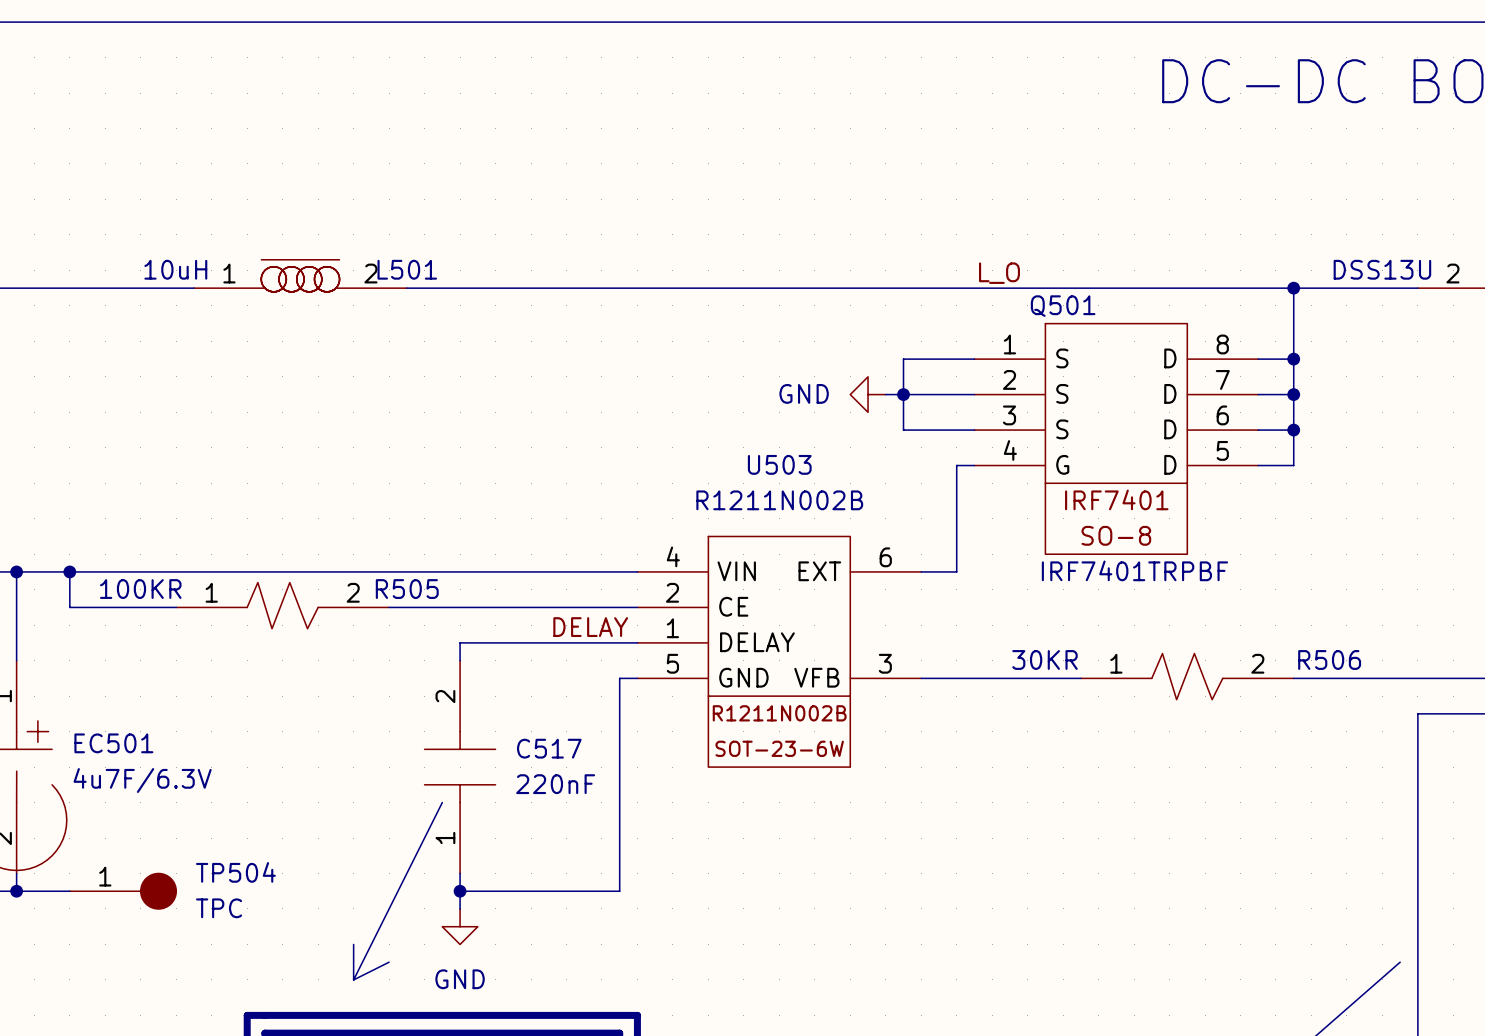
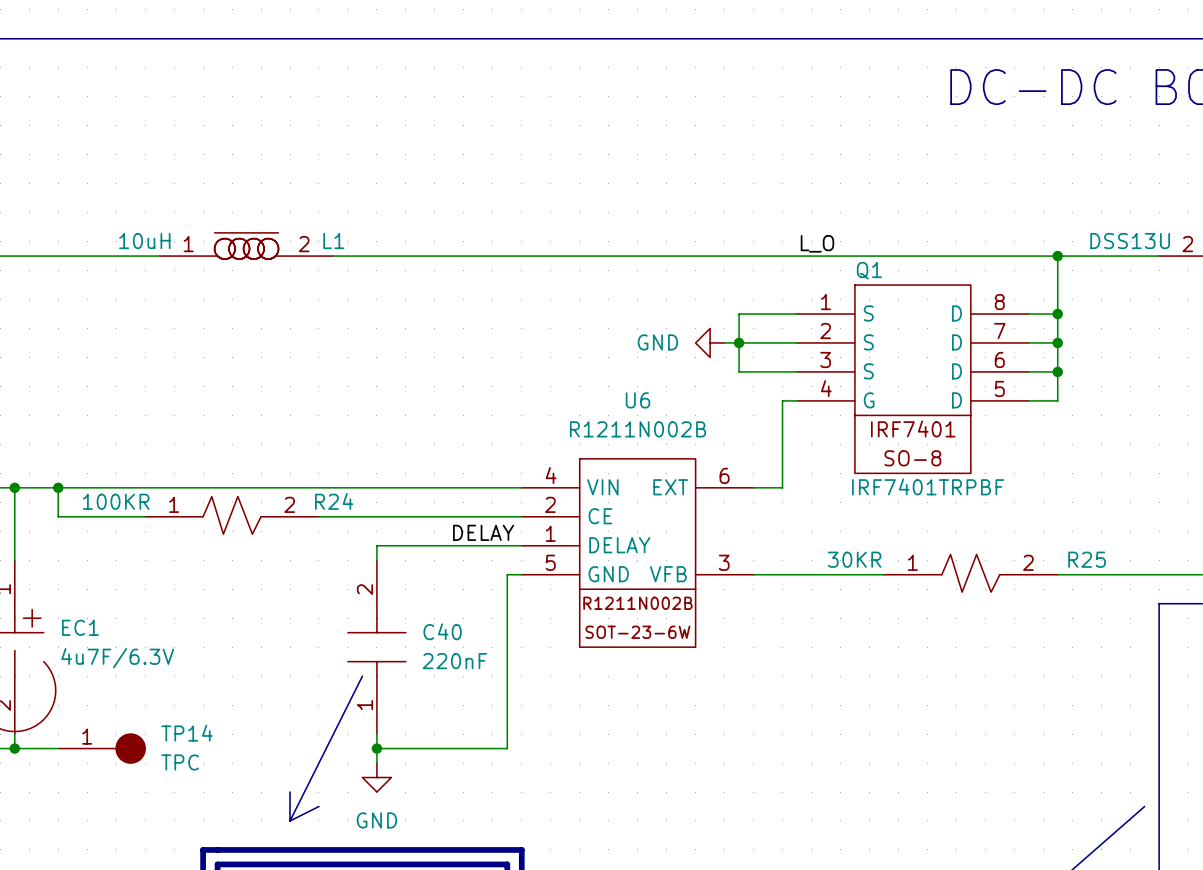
L501 name: L501 (407, 269) -> L1 (333, 241)
Q501 name: Q501 (1063, 306) -> Q1 (869, 270)
U503 name: U503 (779, 464) -> U6 (638, 400)
R505 name: R505 (407, 589) -> R24 (334, 501)
R506 name: R506 (1329, 659) -> R25 (1087, 559)
EC501 name: EC501 (113, 743) -> EC1 (80, 627)
C517 name: C517 (549, 748) -> C40 (442, 631)
TP504 name: TP504 (235, 872) -> TP14 (187, 733)

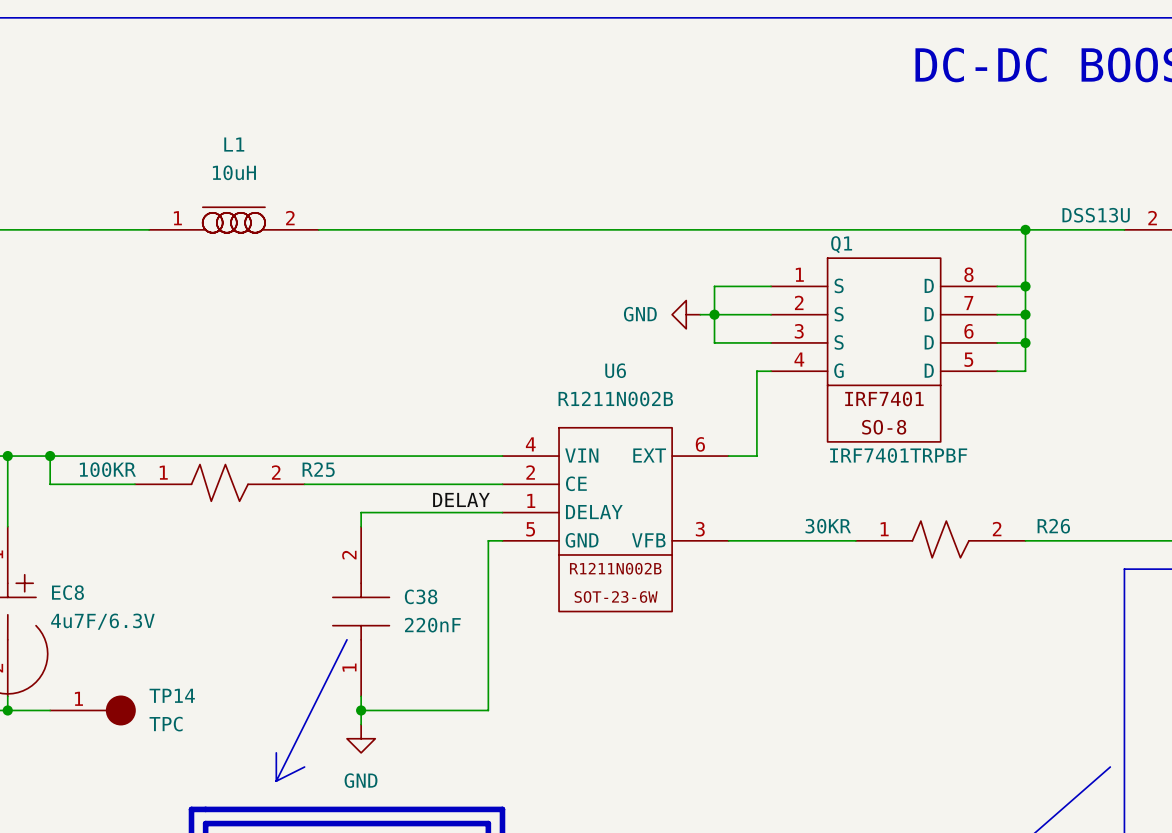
L1 value position: 10uH (144, 241) -> 10uH (234, 172)
L1 name position: L1 (333, 241) -> L1 (234, 144)
label: L_O (817, 243) -> none
R24 name: R24 (334, 501) -> R25 (318, 469)
R25 name: R25 (1087, 559) -> R26 (1053, 526)
EC1 name: EC1 (80, 627) -> EC8 (67, 592)
C40 name: C40 (442, 631) -> C38 (421, 596)

